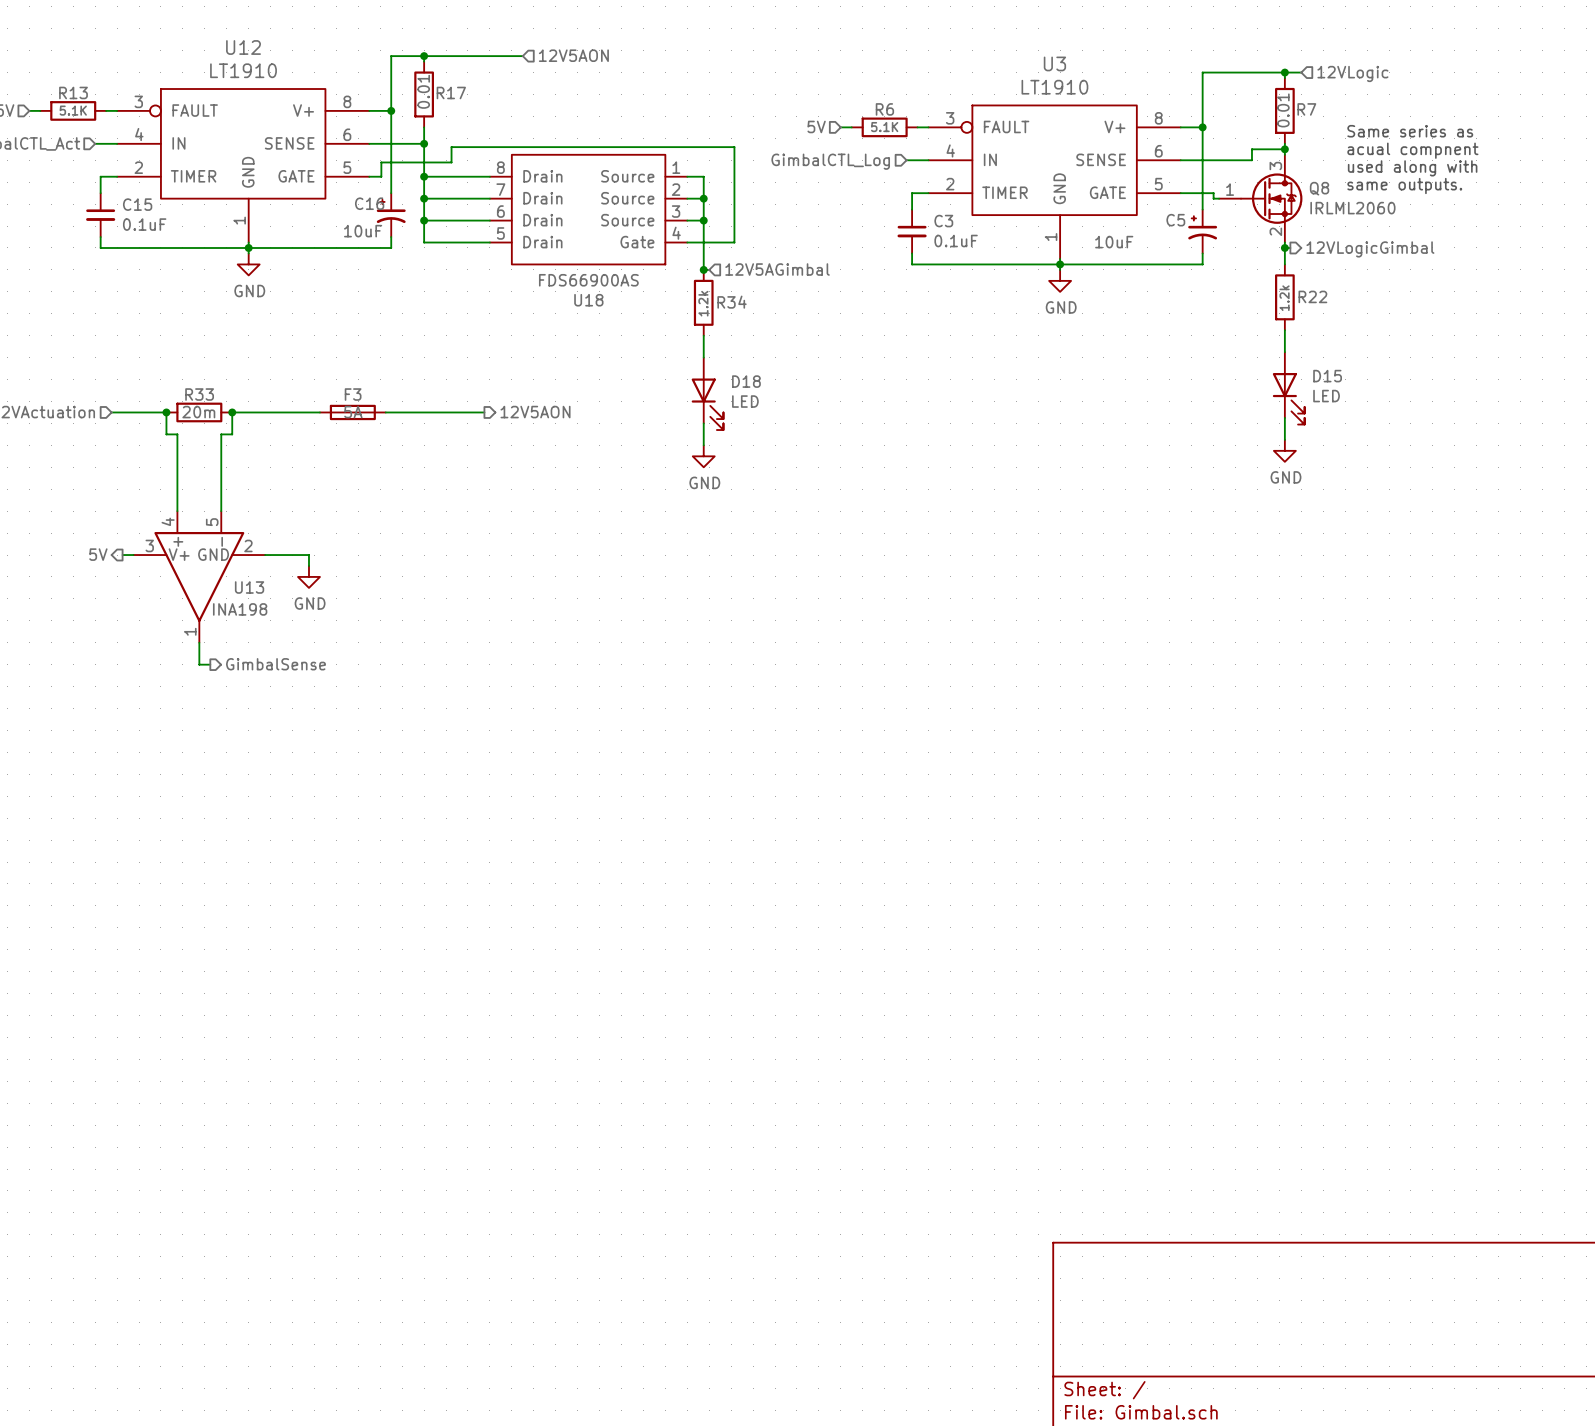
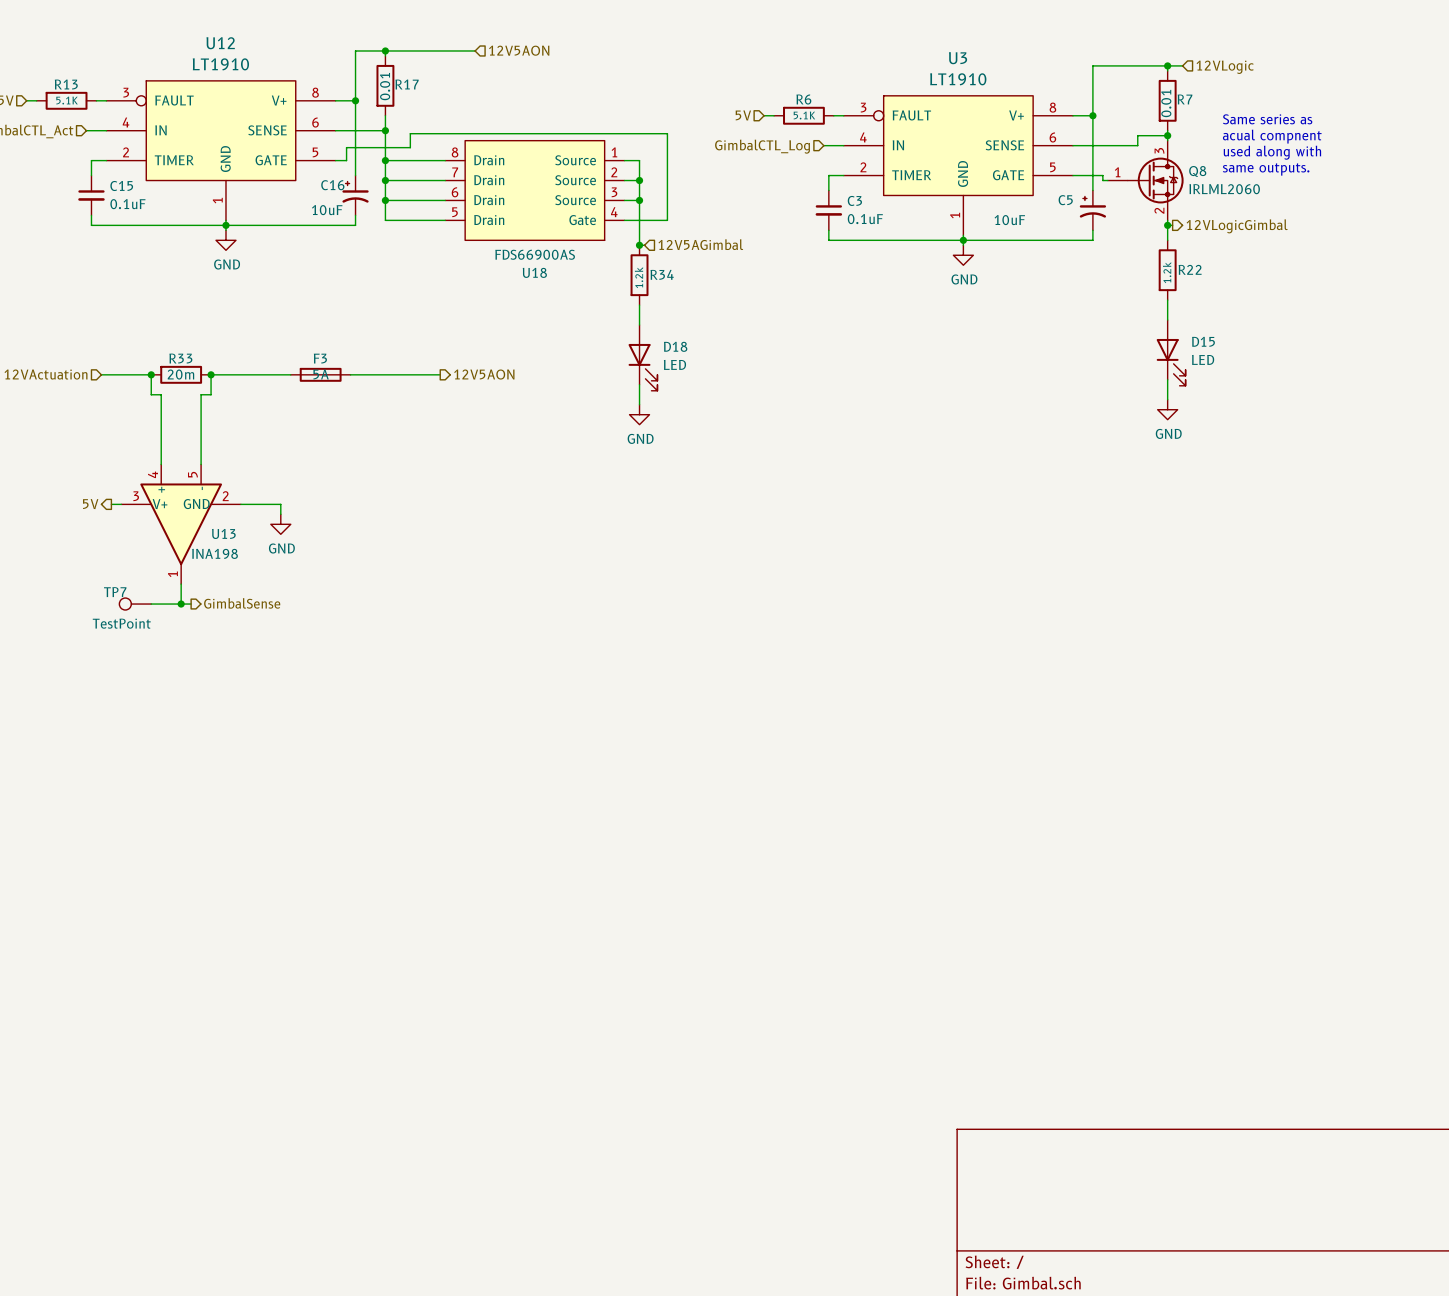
TP7: none -> TestPoint (135, 604)
wire: none -> (151, 604) (181, 604)
junction: none -> (181, 604)

